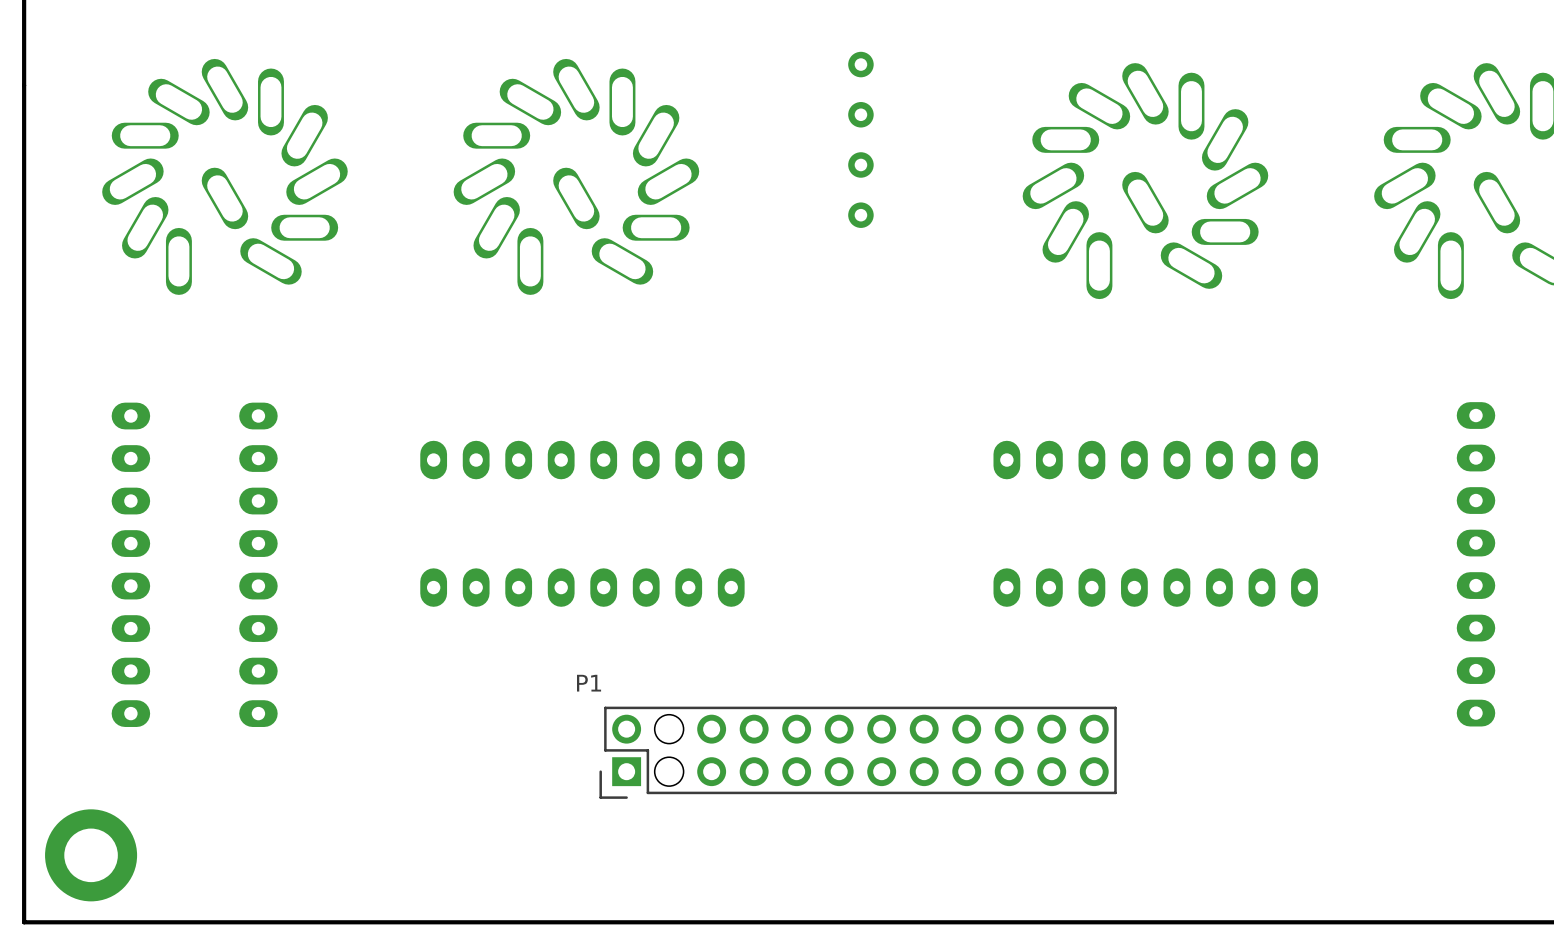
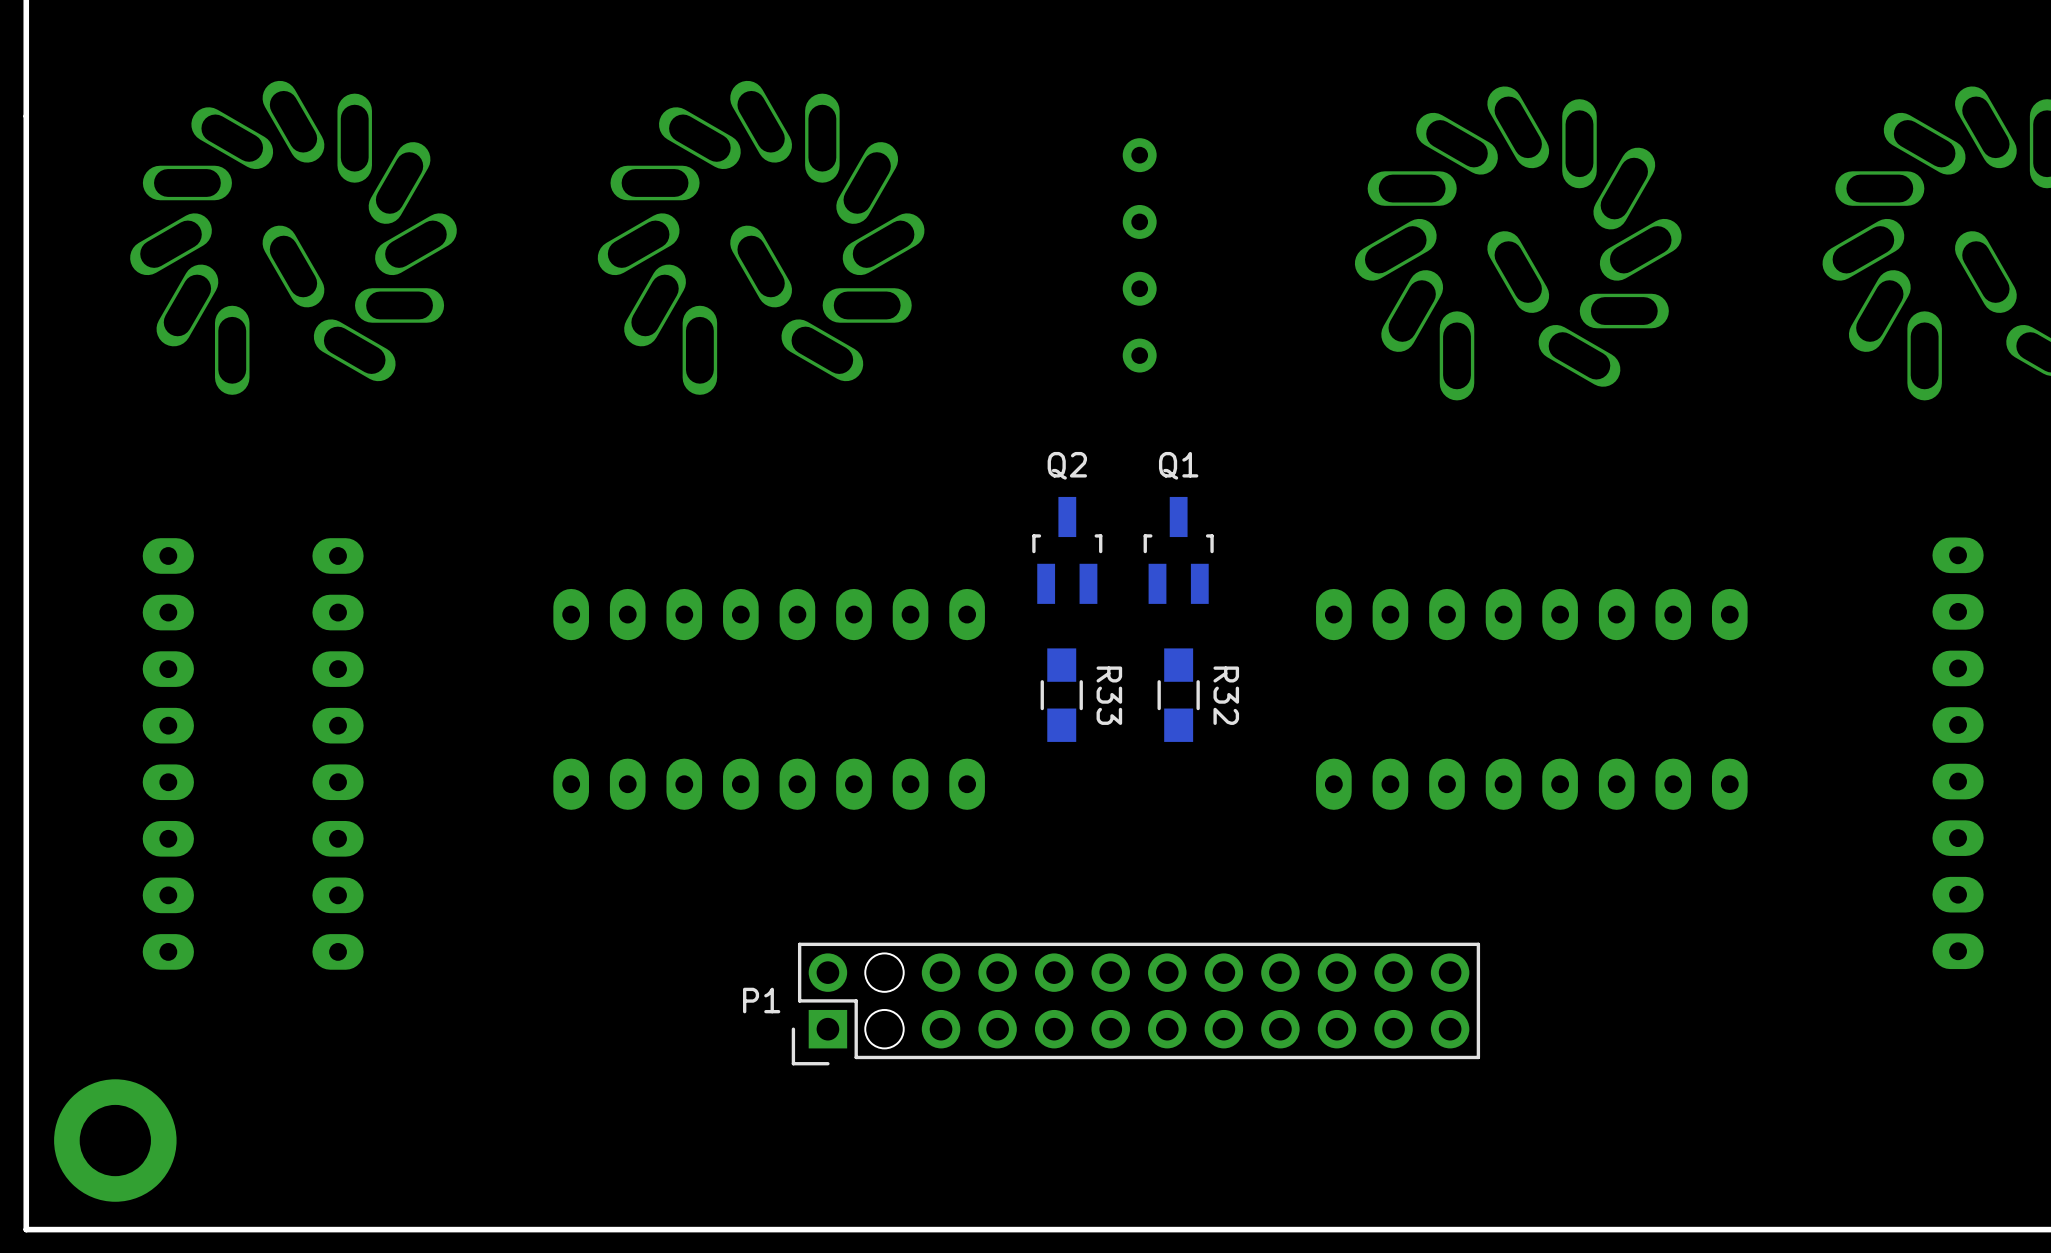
part: (860, 89) -> none
part: none -> (1139, 322)
Q2: none -> (1067, 550)
Q1: none -> (1178, 550)
R33: none -> (1061, 695)
R32: none -> (1178, 695)
P1 name position: P1 (589, 683) -> P1 (761, 1000)

